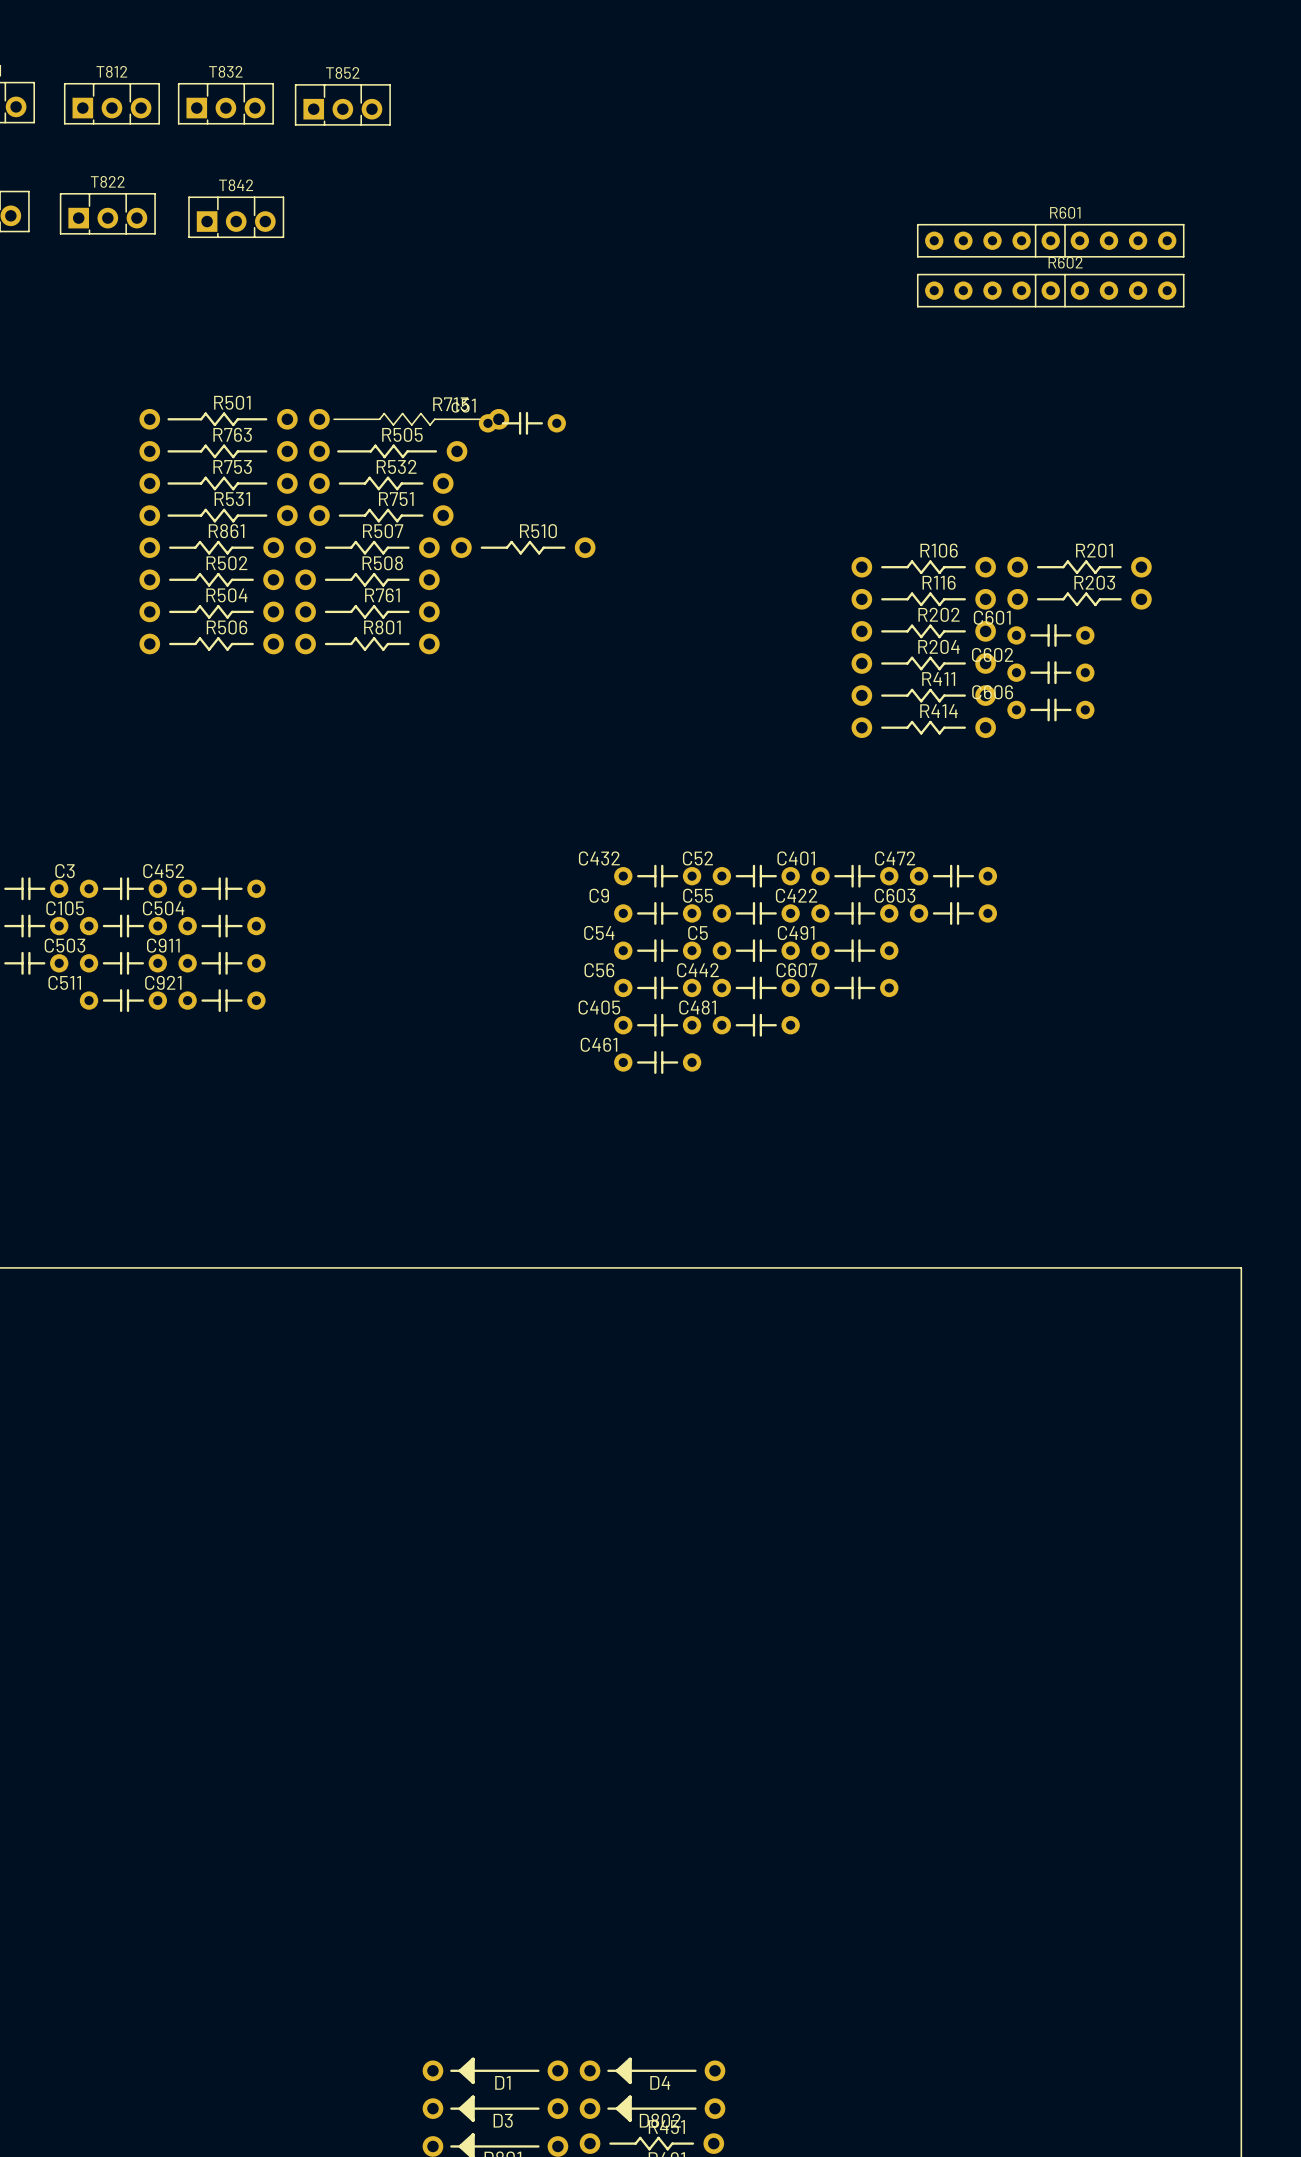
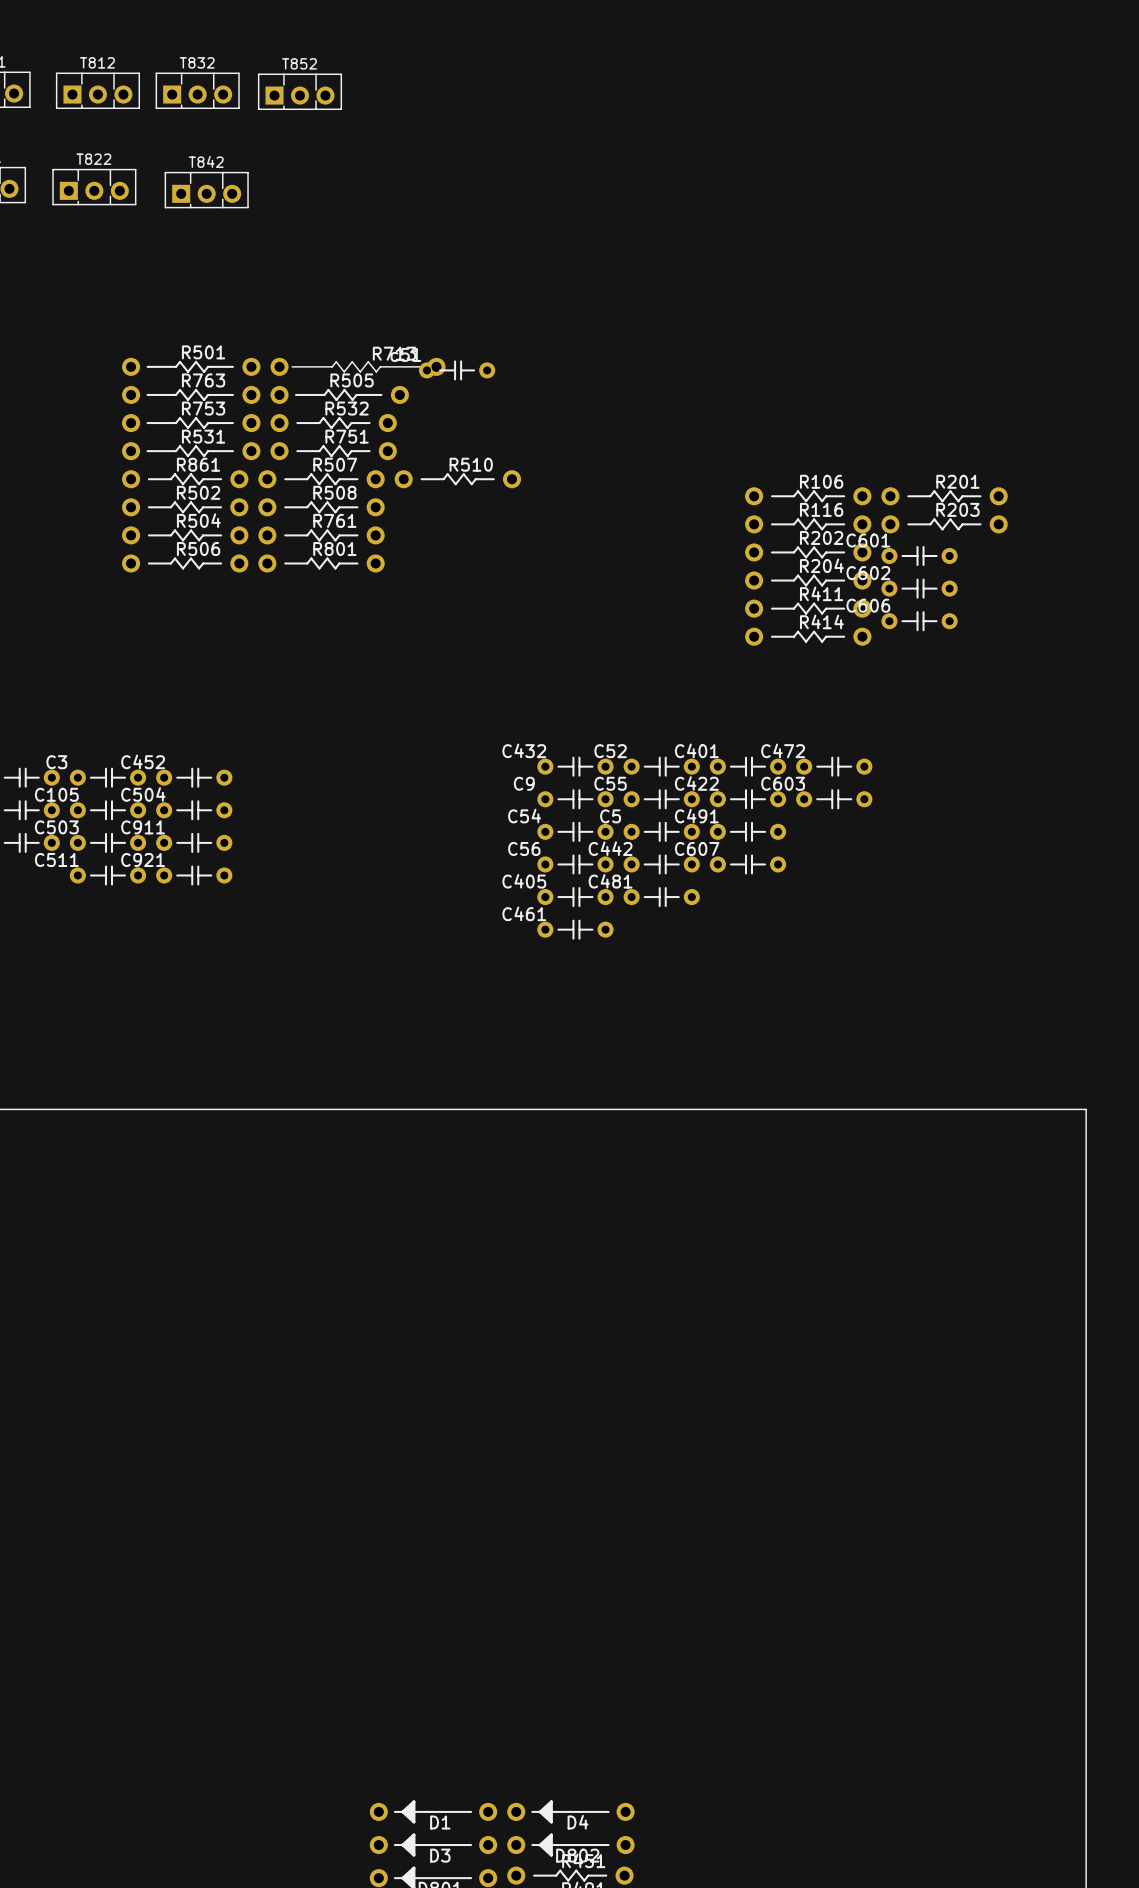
R601: (1050, 240) -> none
R602: (1050, 290) -> none

